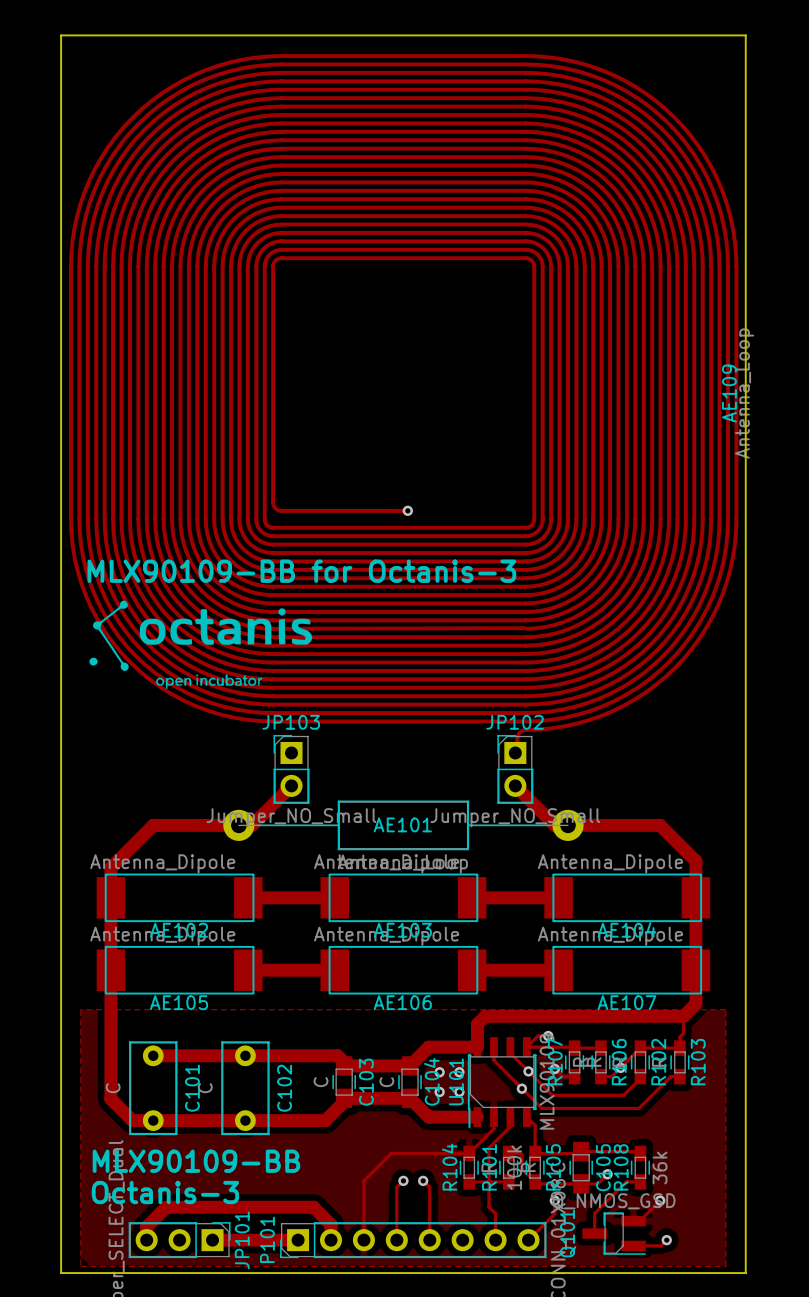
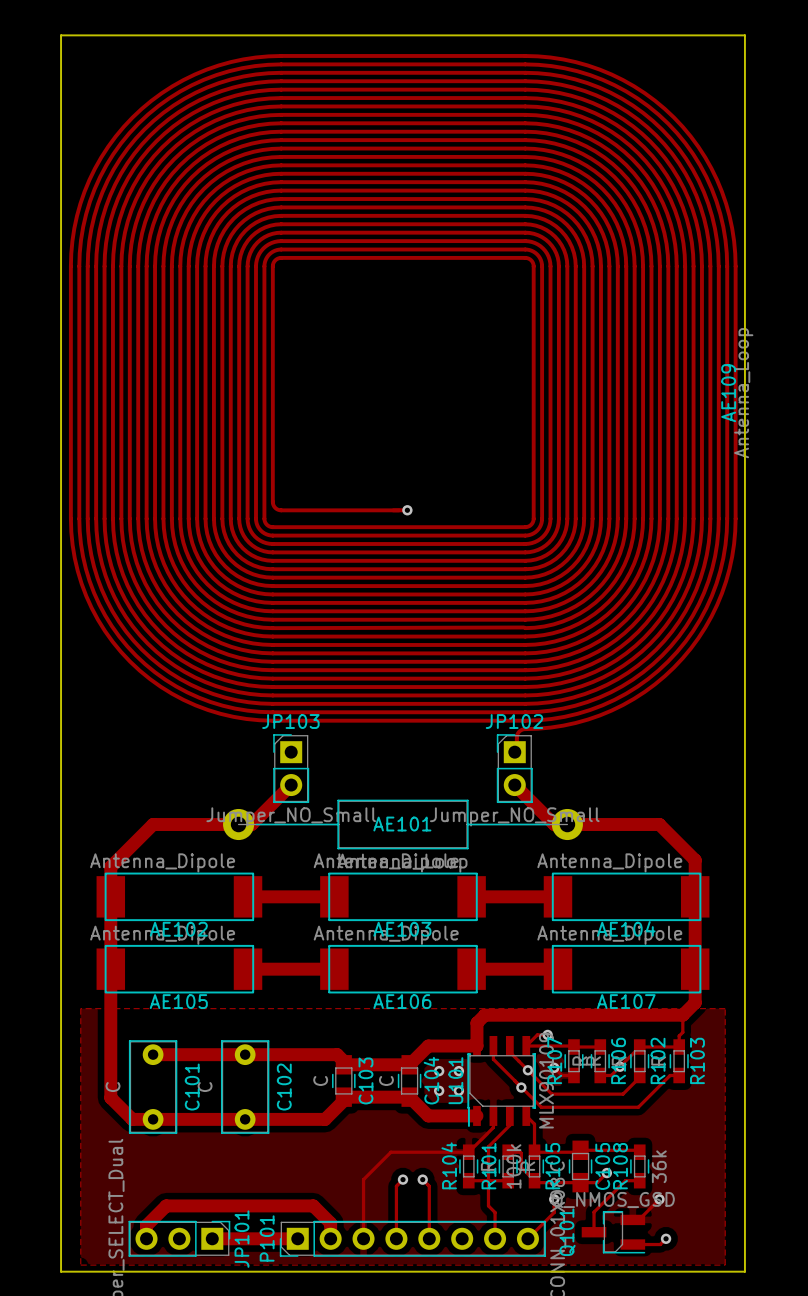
text: MLX90109-BB for Octanis-3 (301, 571) -> none
drawing: [89, 600, 313, 690] -> none
text: MLX90109-BB (196, 1161) -> none
text: Octanis-3 (165, 1192) -> none

